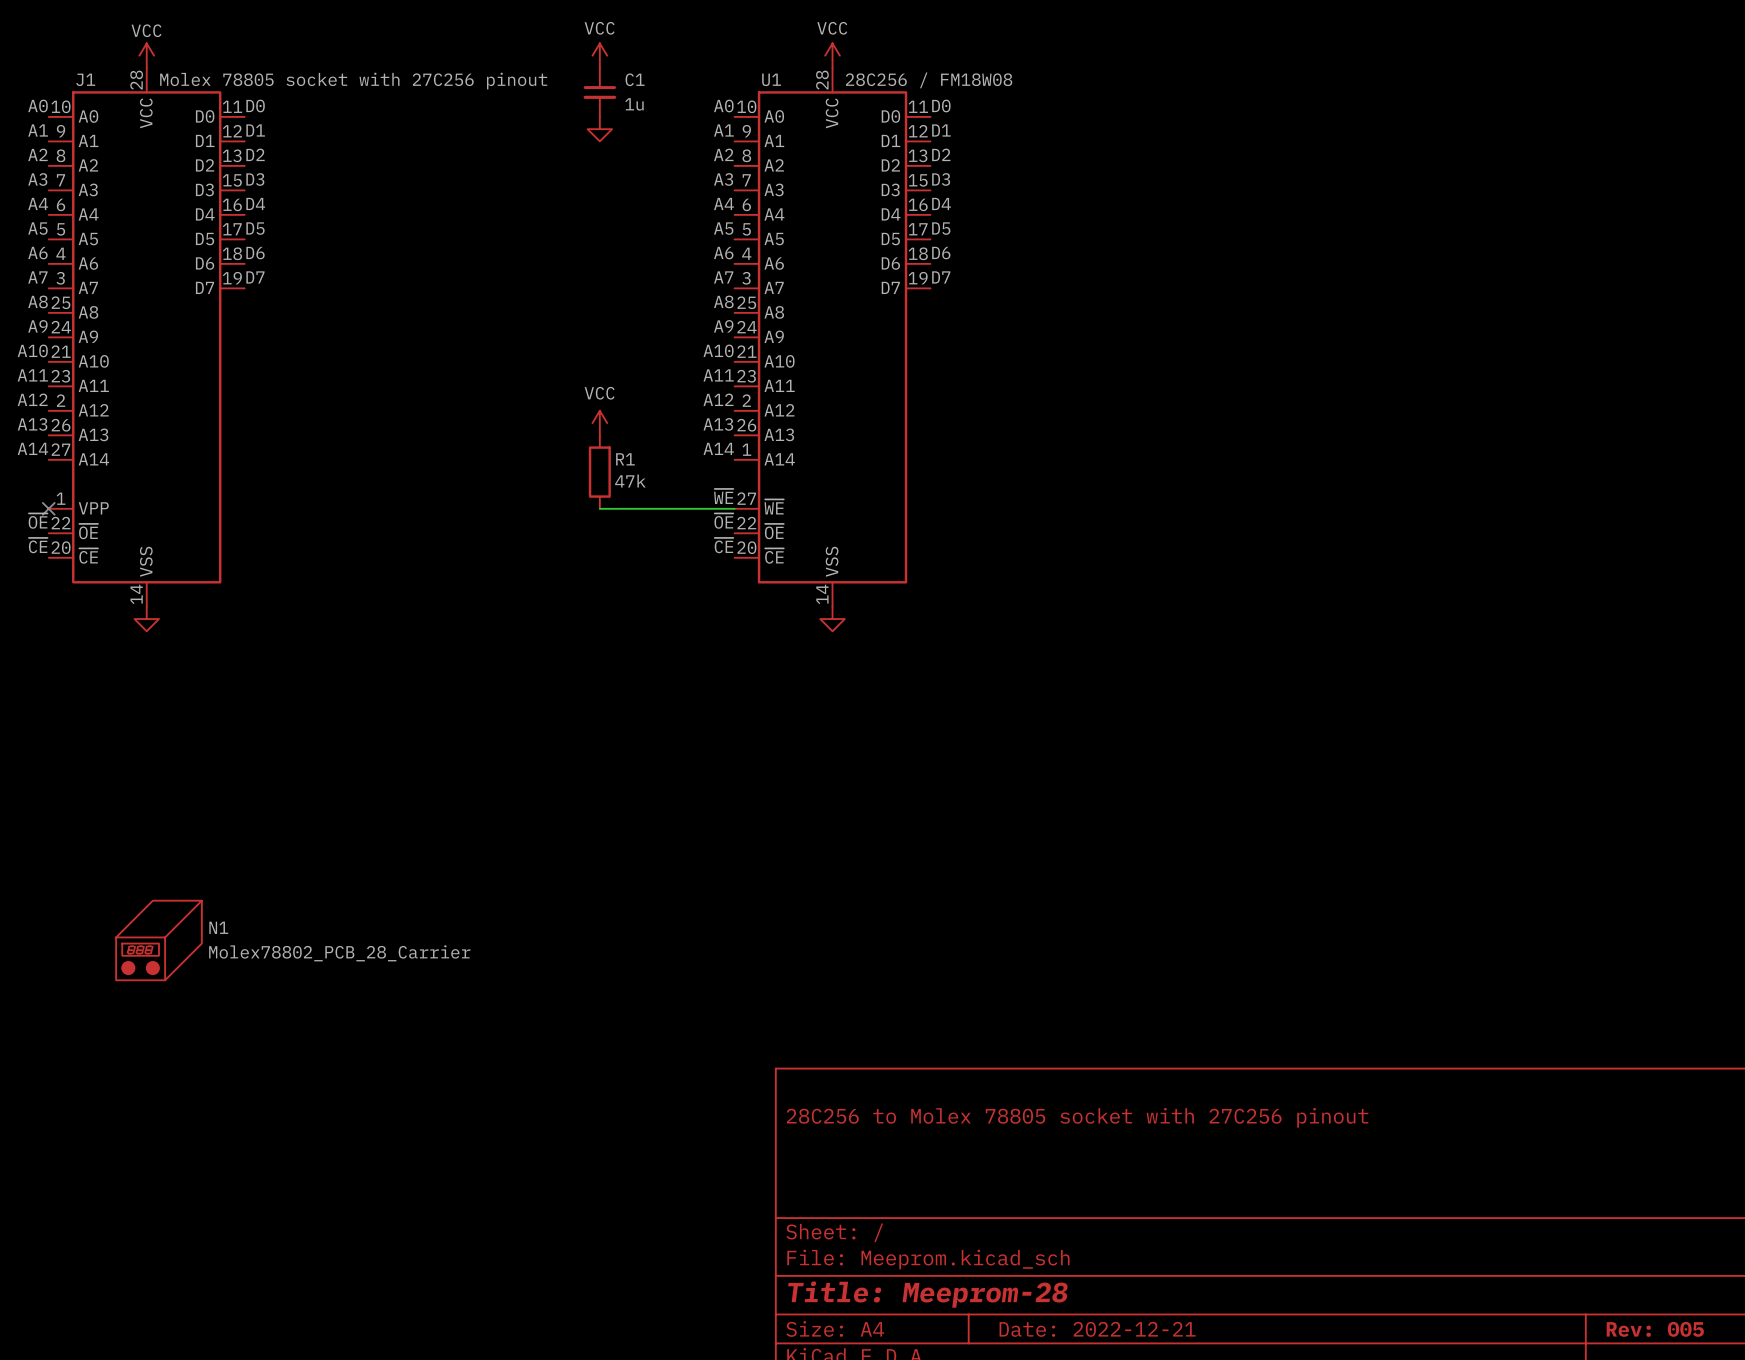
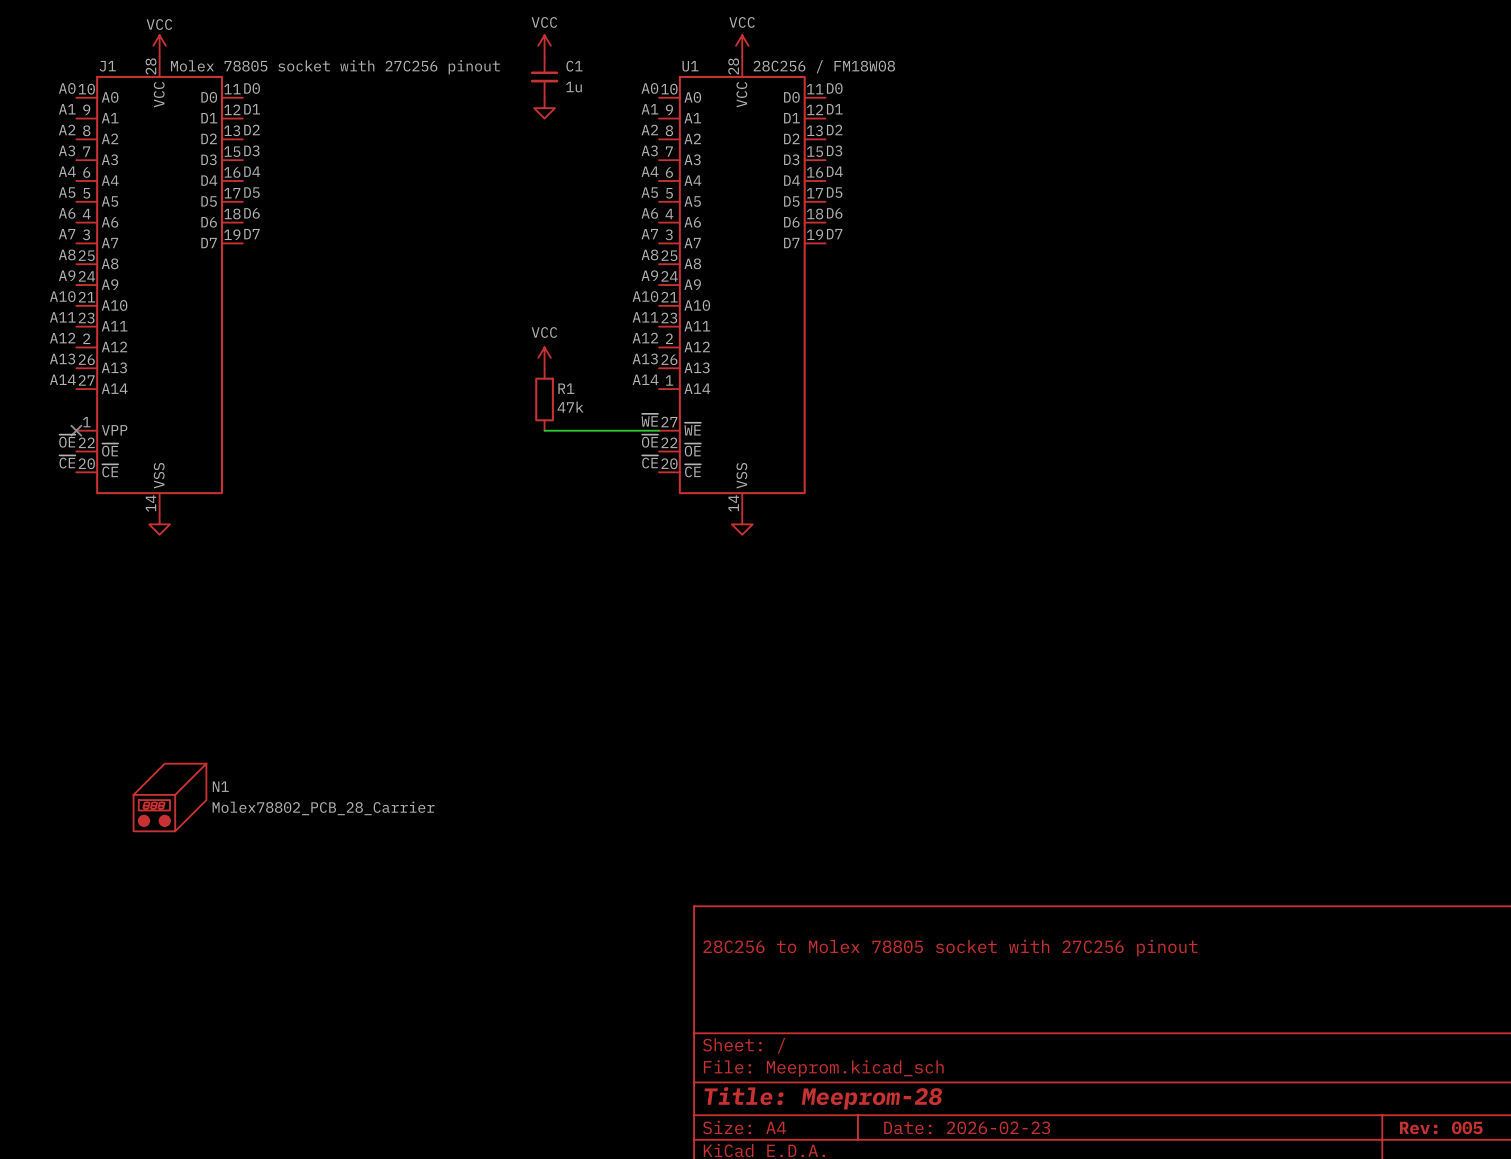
title block: Date: 2022-12-21 (1097, 1329) -> Date: 2026-02-23 (967, 1127)

